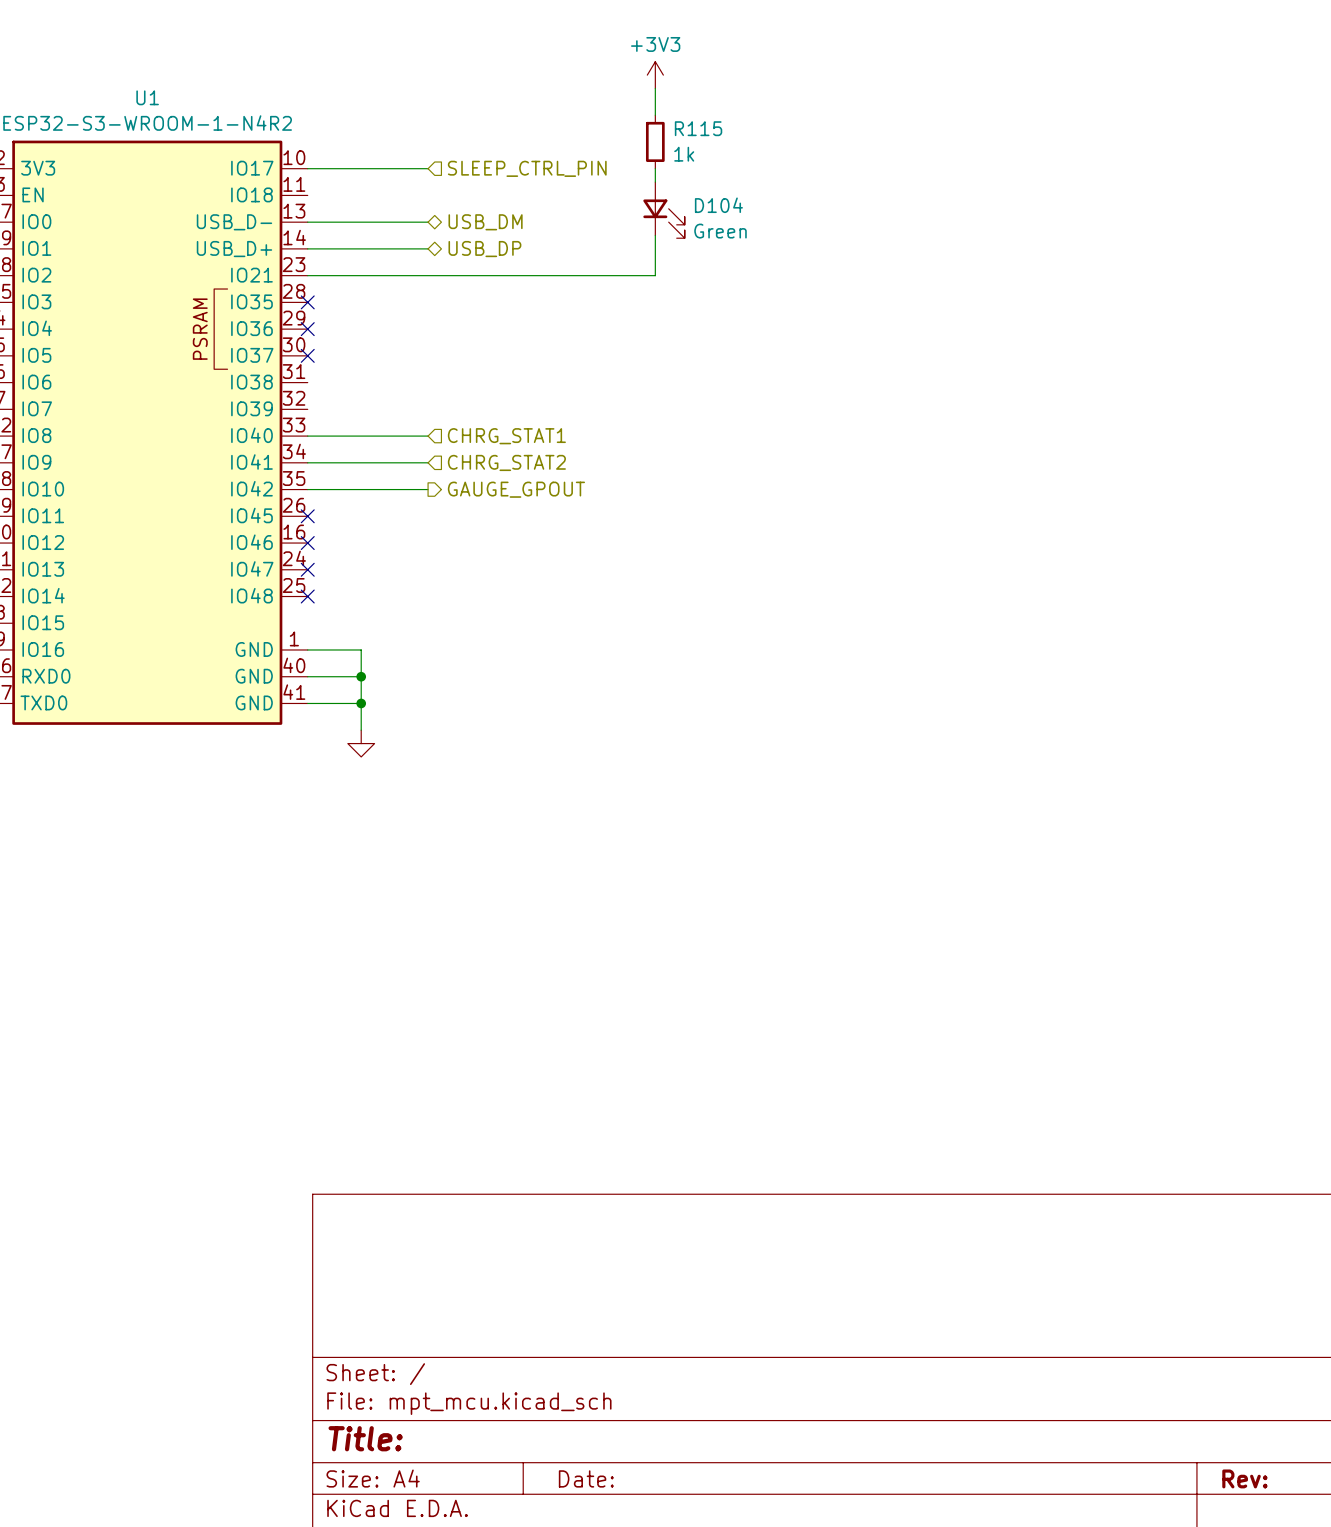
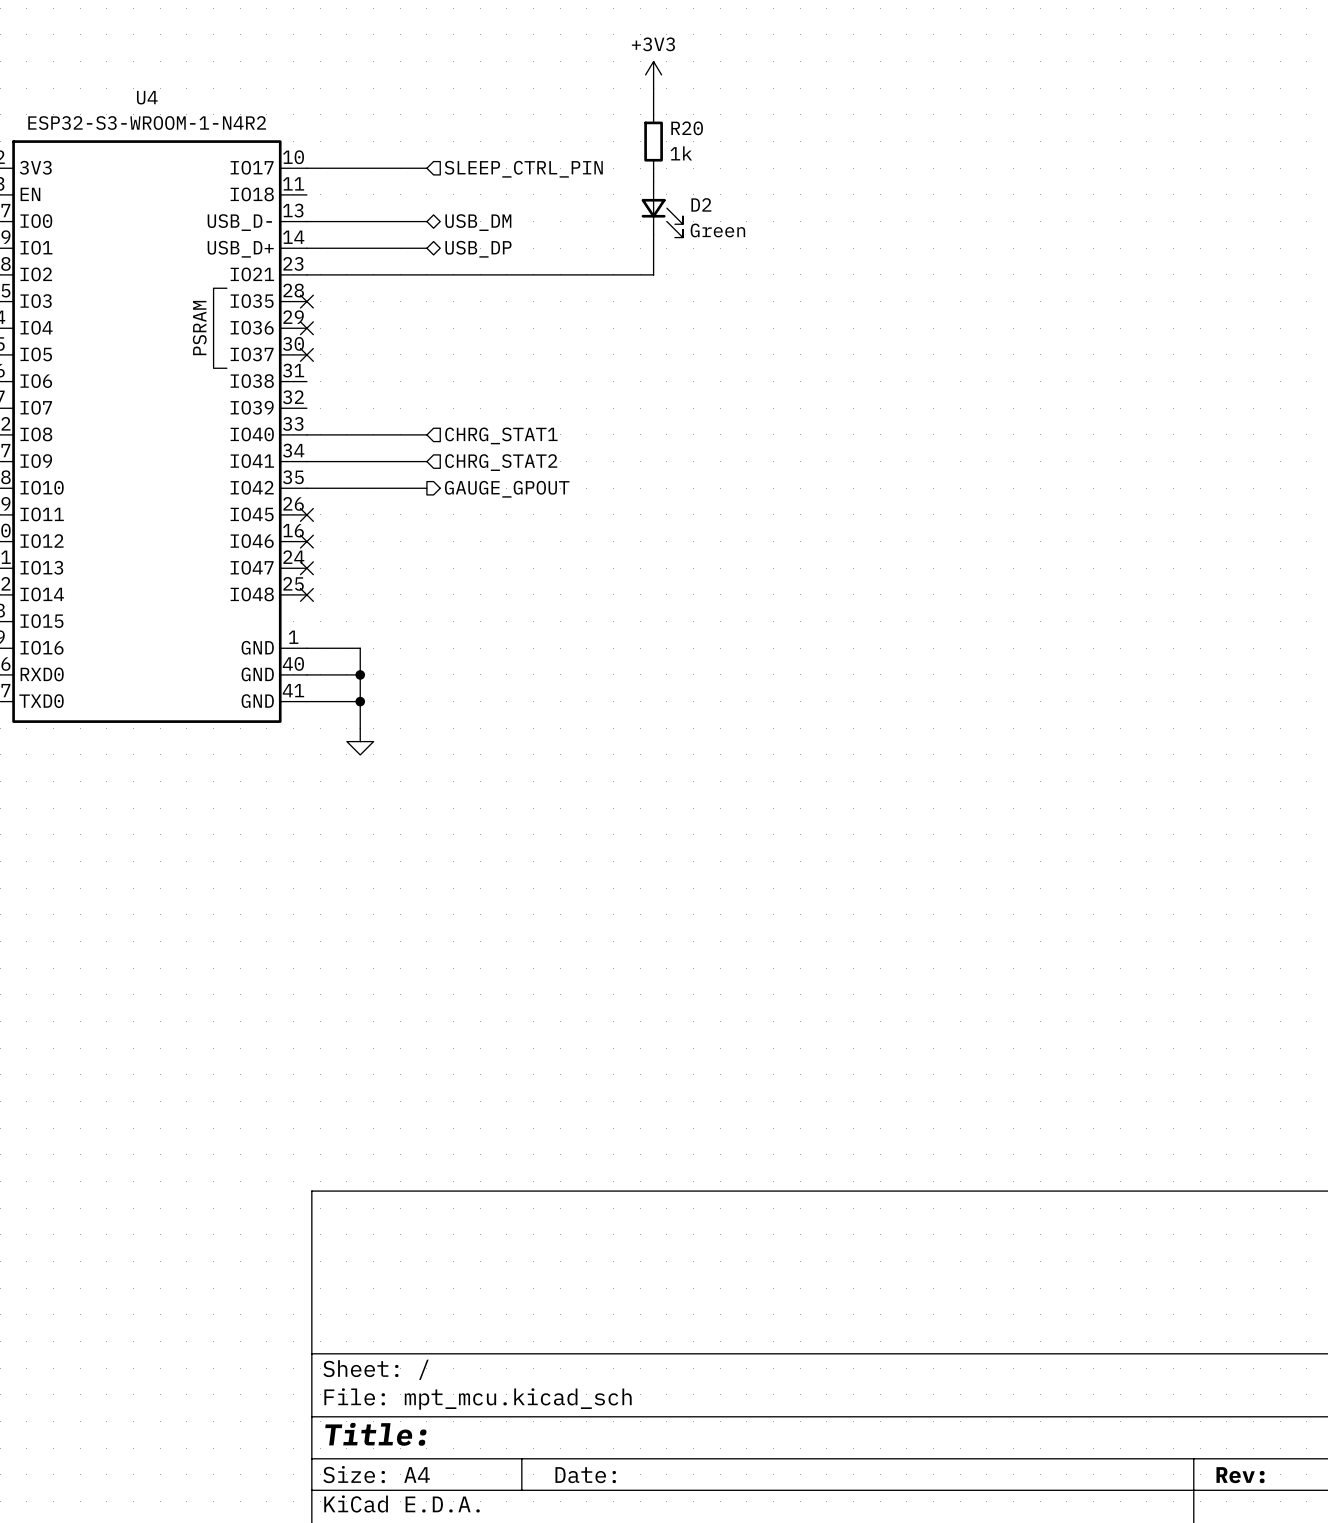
U1 name: U1 (147, 97) -> U4 (147, 97)
R115 name: R115 (698, 128) -> R20 (687, 128)
D104 name: D104 (718, 205) -> D2 (701, 204)

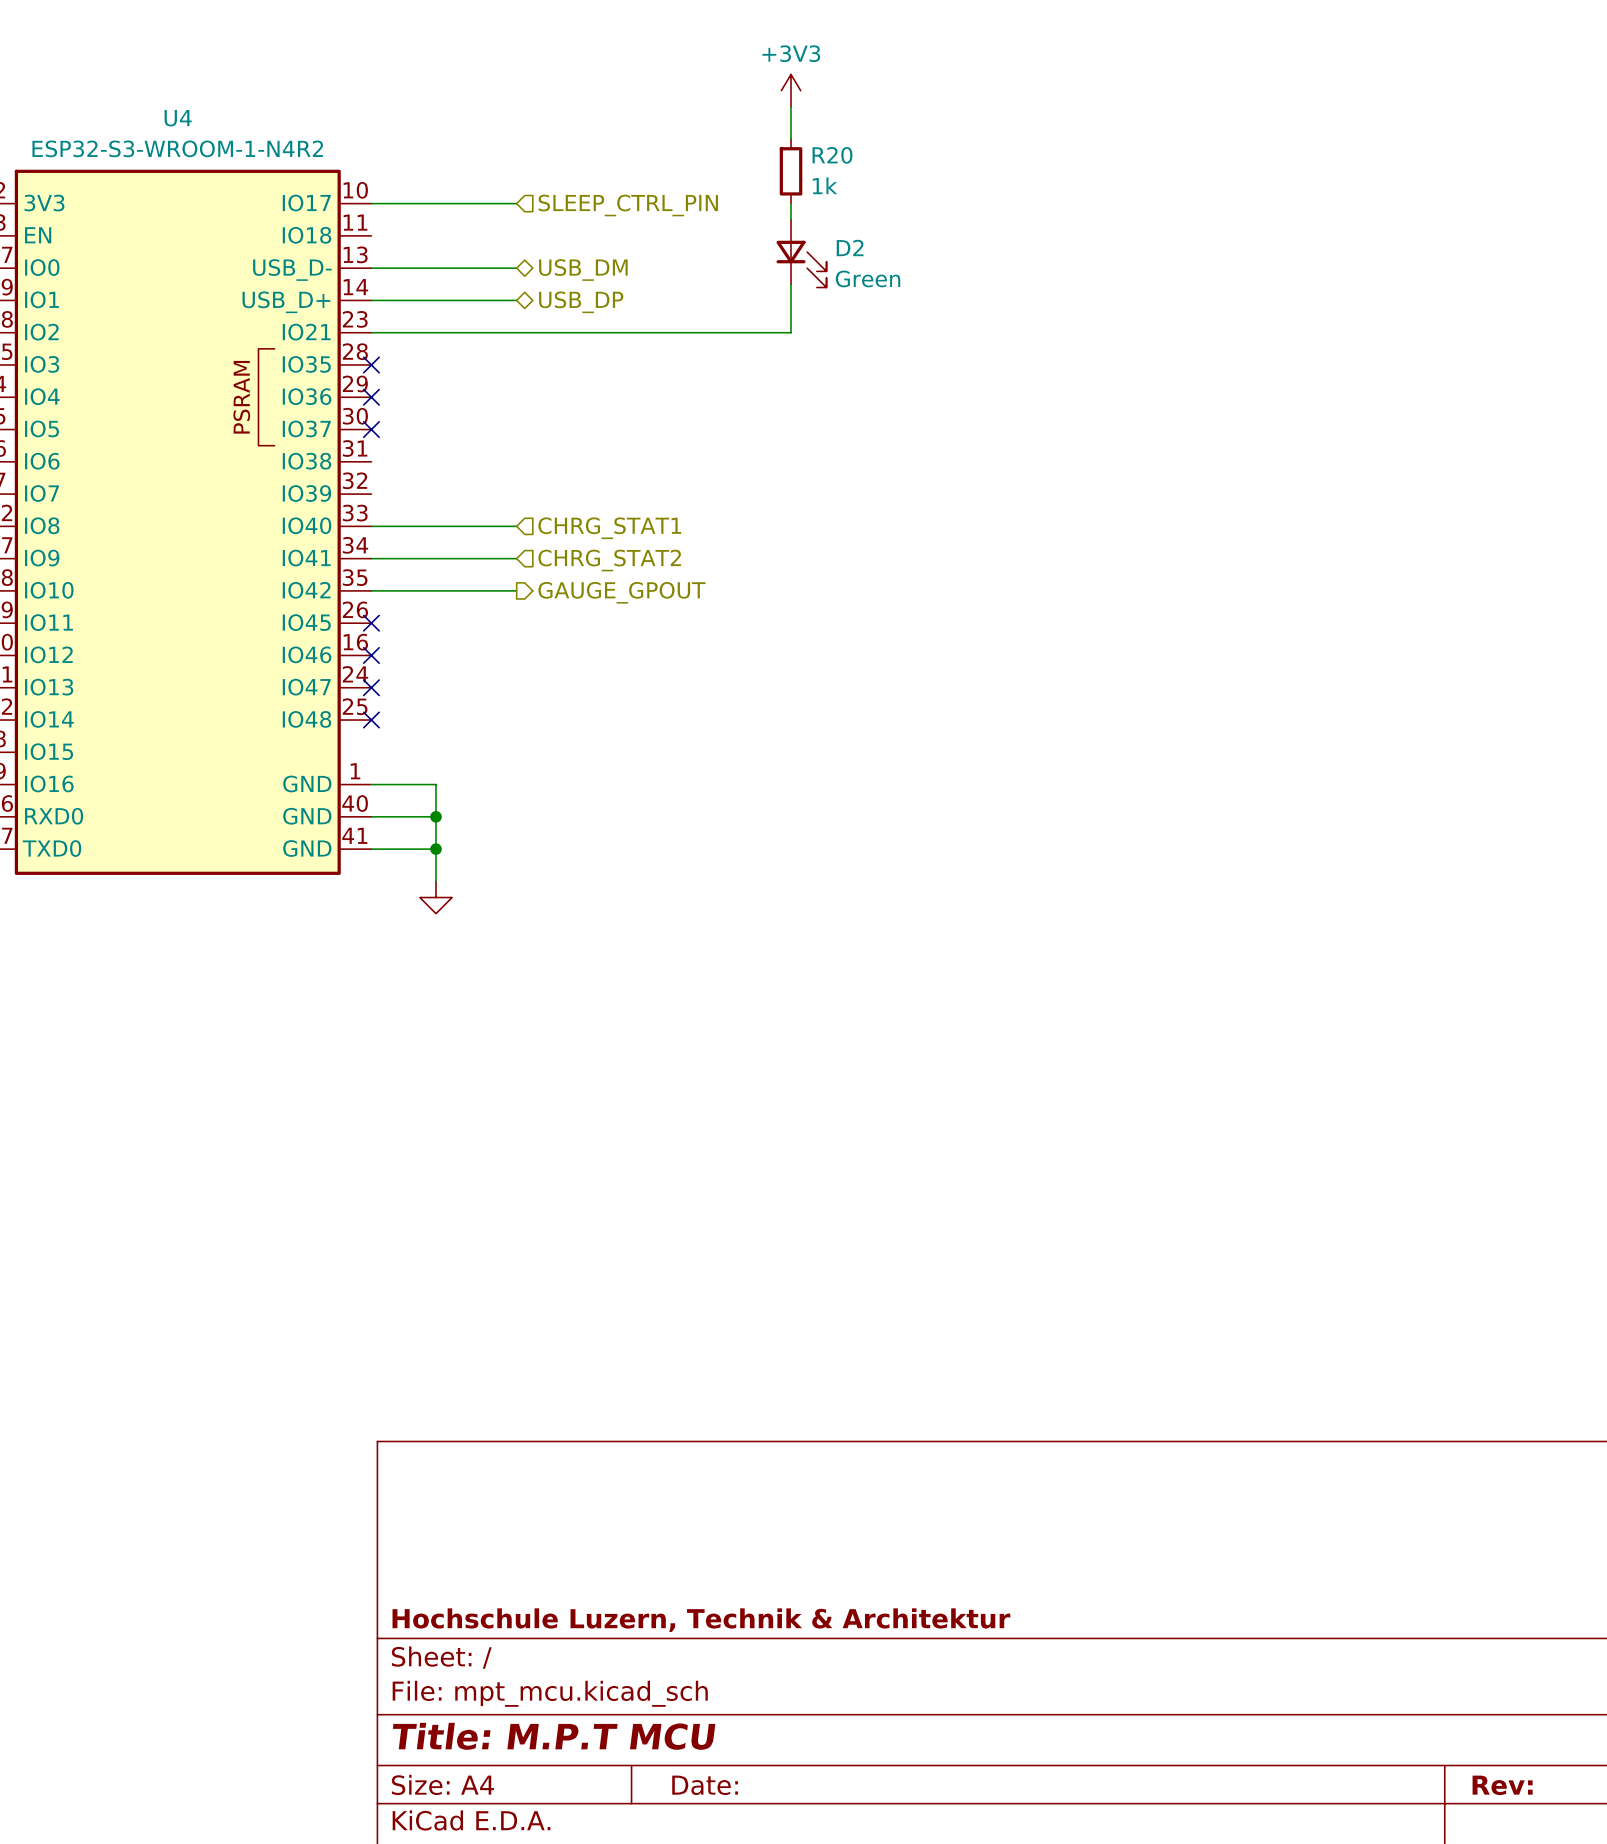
title block: none -> Hochschule Luzern, Technik & Architektur (701, 1620)
title block: Title: (375, 1434) -> Title: M.P.T MCU (554, 1736)

